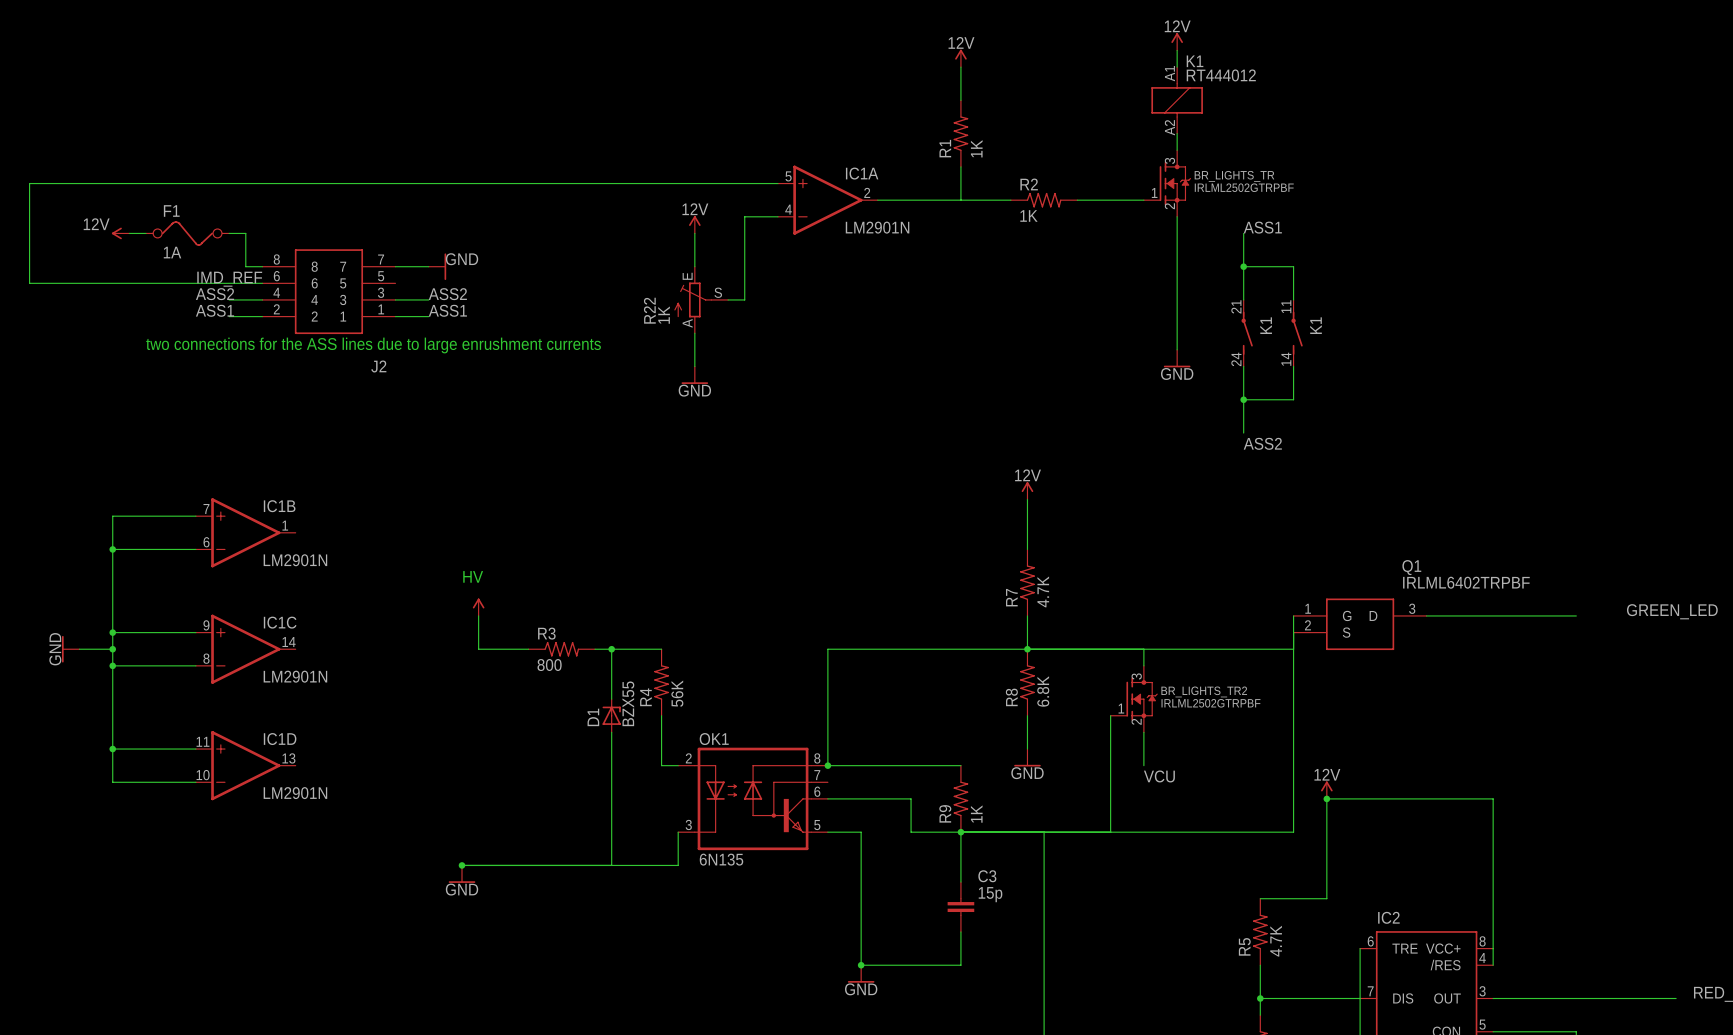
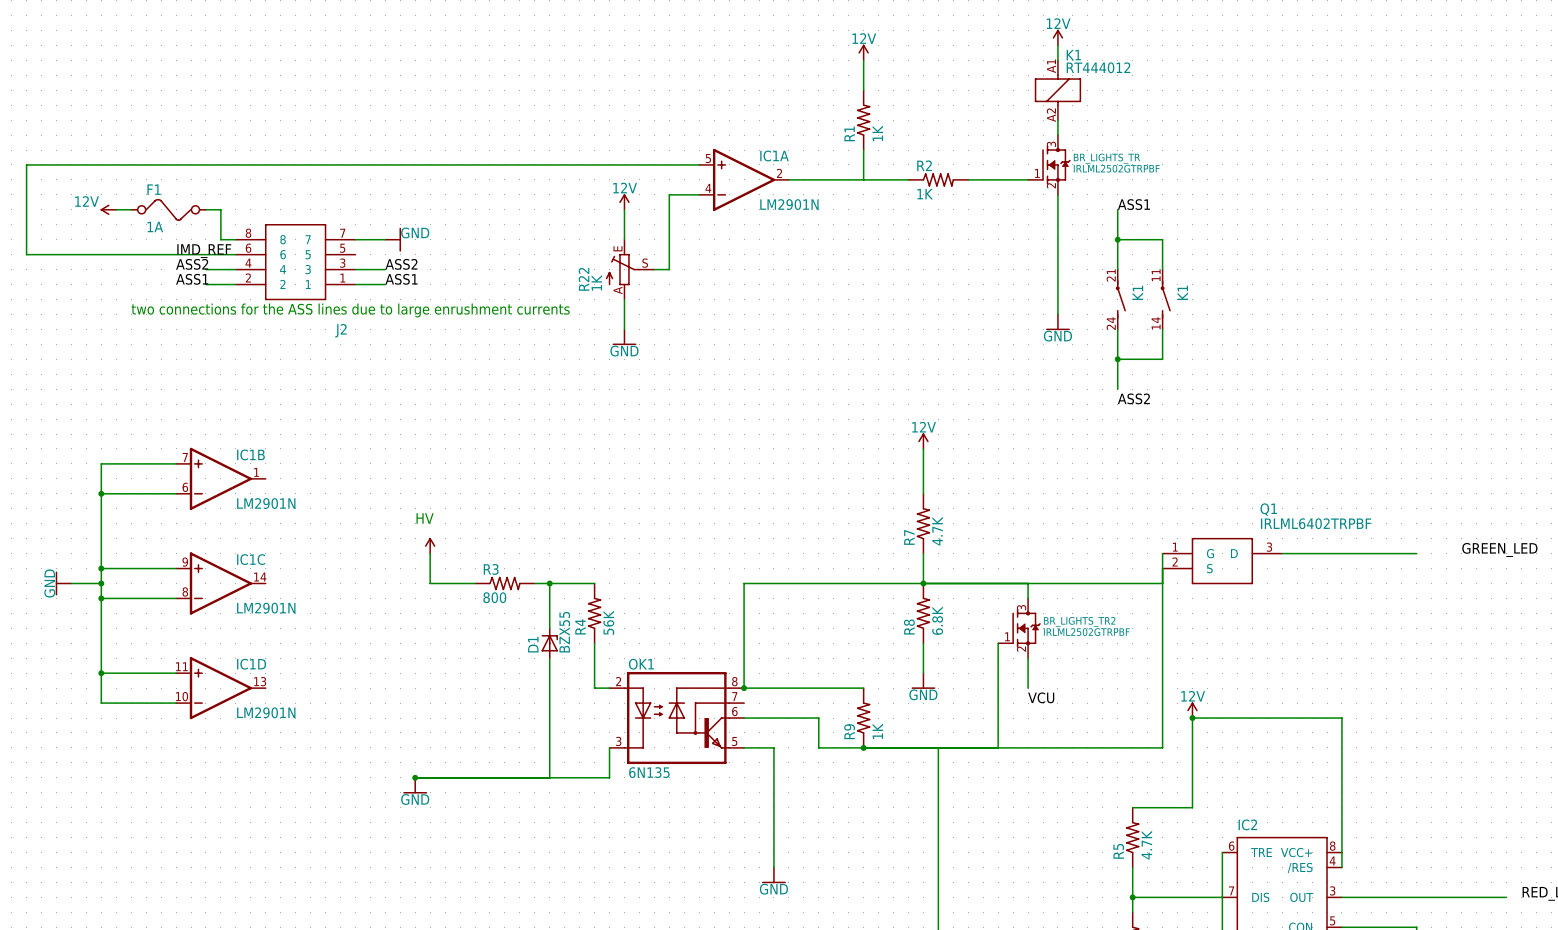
wire: (960, 832) (960, 882) -> none
C3: 15p (960, 907) -> none
wire: (960, 931) (960, 965) (861, 965) -> none
junction: (861, 965) -> none

